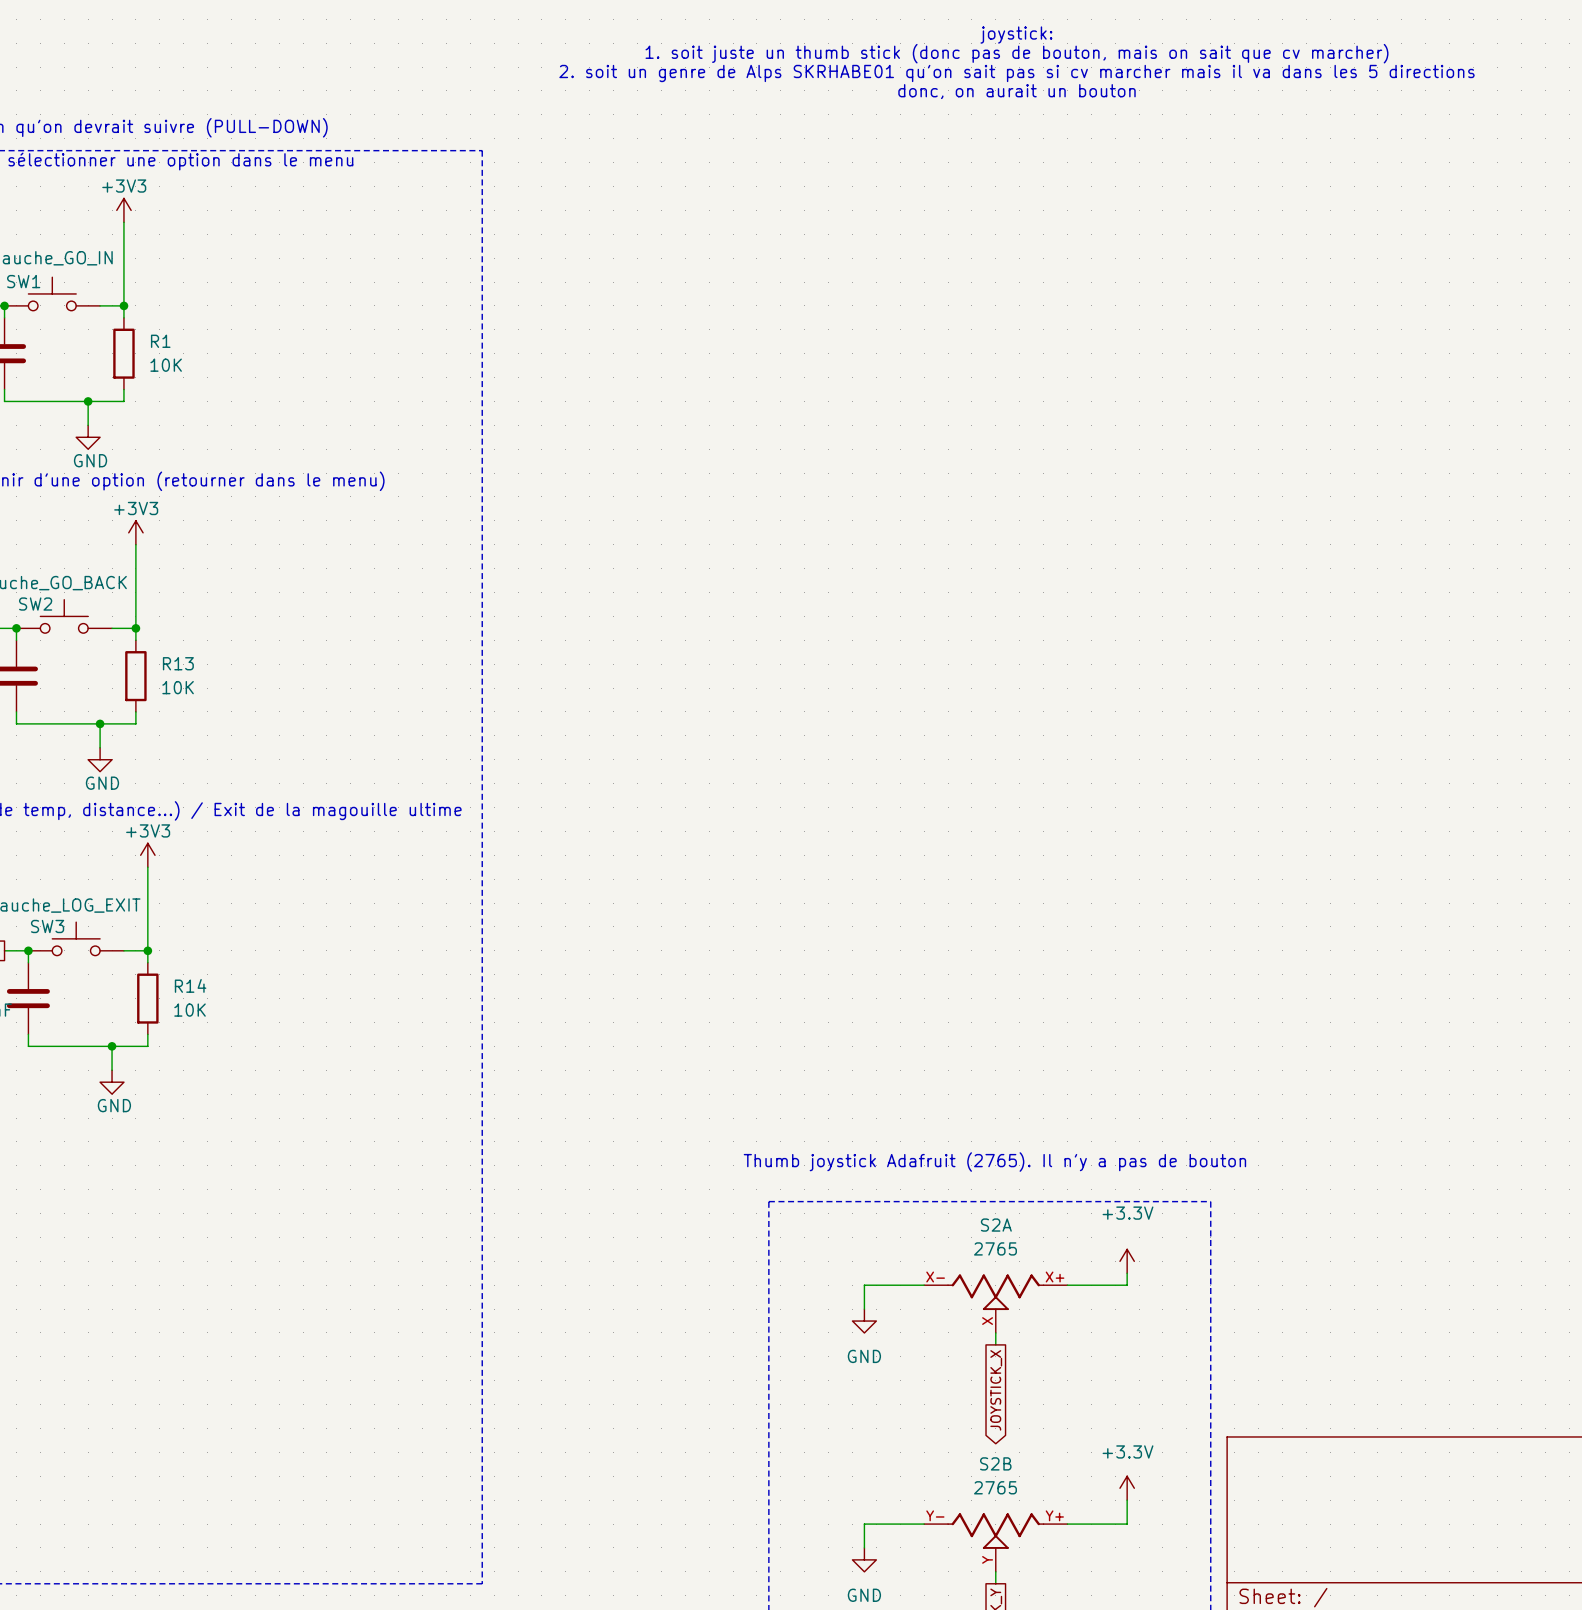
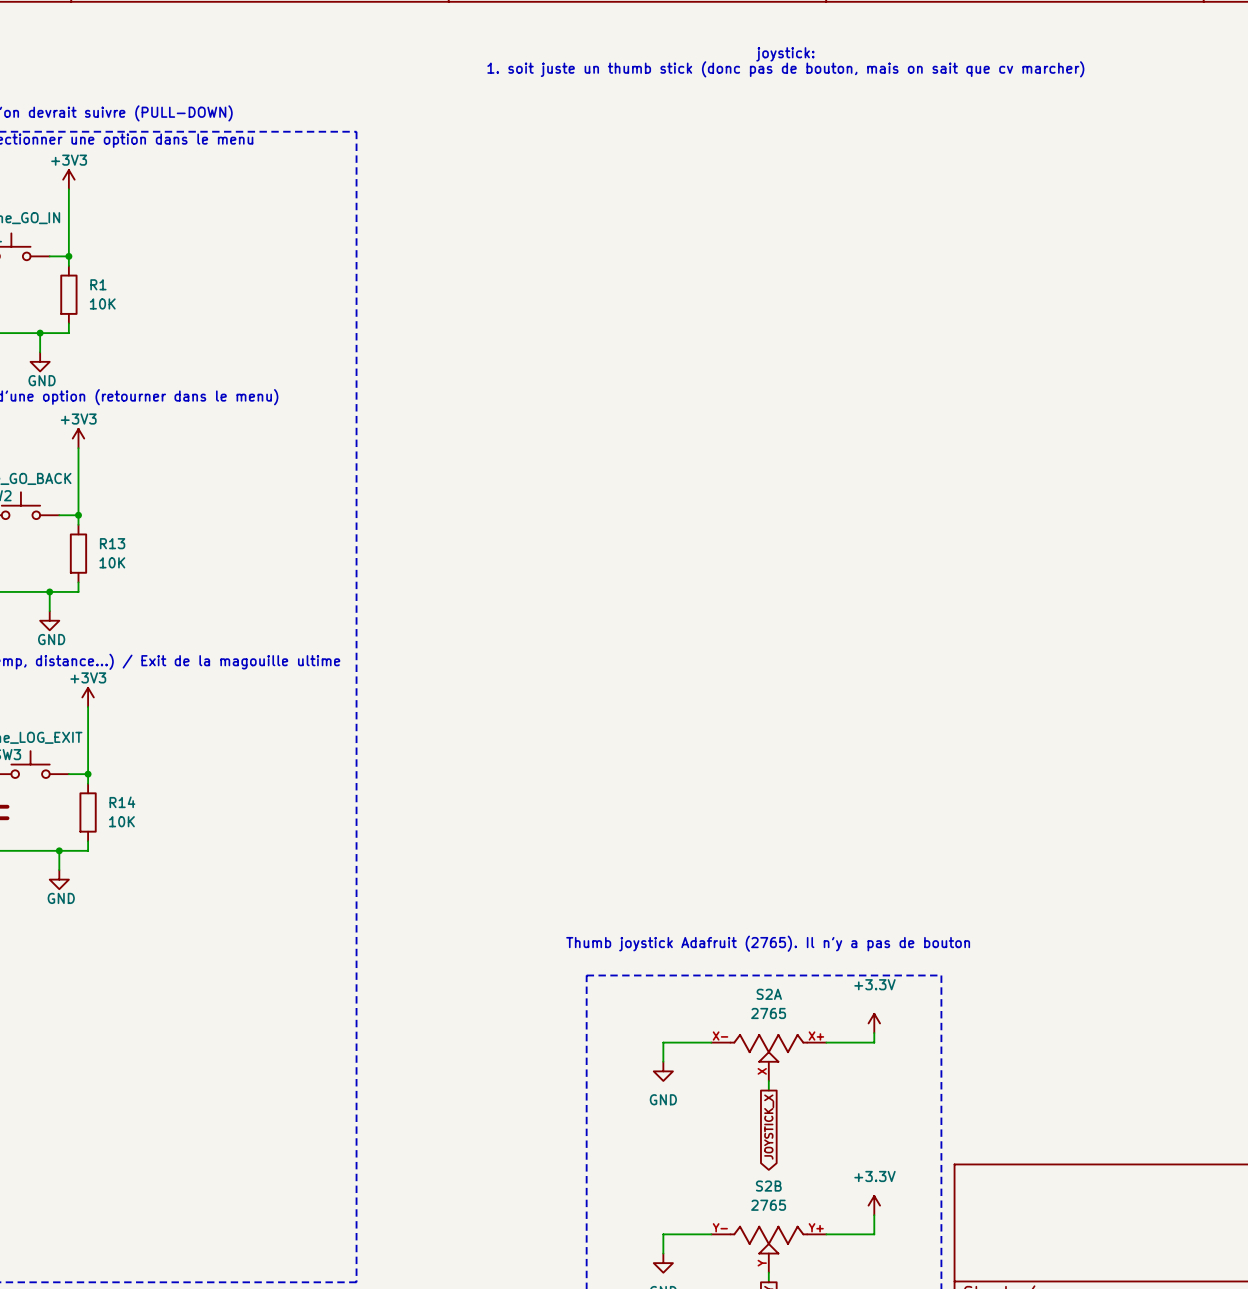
text: joystick: (1016, 35) -> none
text: 1. soit juste un thumb stick (donc pas de bouton, mais on sait que cv marcher) (1016, 53) -> joystick: (785, 54)
text: 2. soit un genre de Alps SKRHABE01 qu'on sait pas si cv marcher mais il va dans les 5 directions (1016, 73) -> 1. soit juste un thumb stick (donc pas de bouton, mais on sait que cv marcher) (785, 69)
text: donc, on aurait un bouton (1016, 91) -> none

